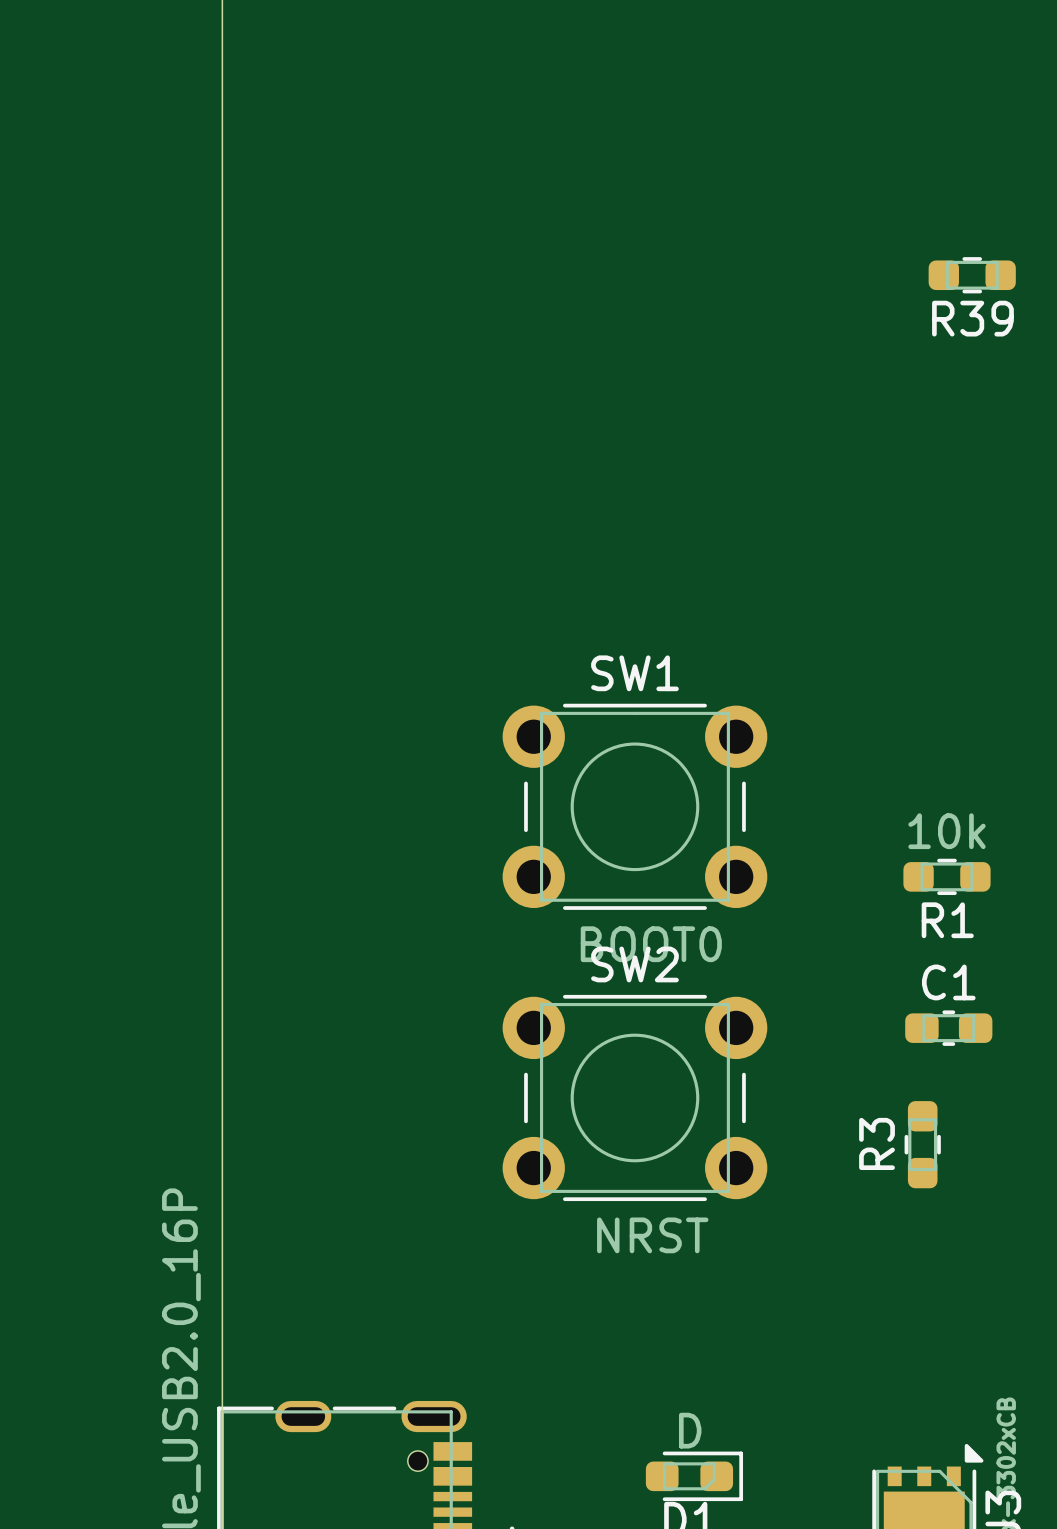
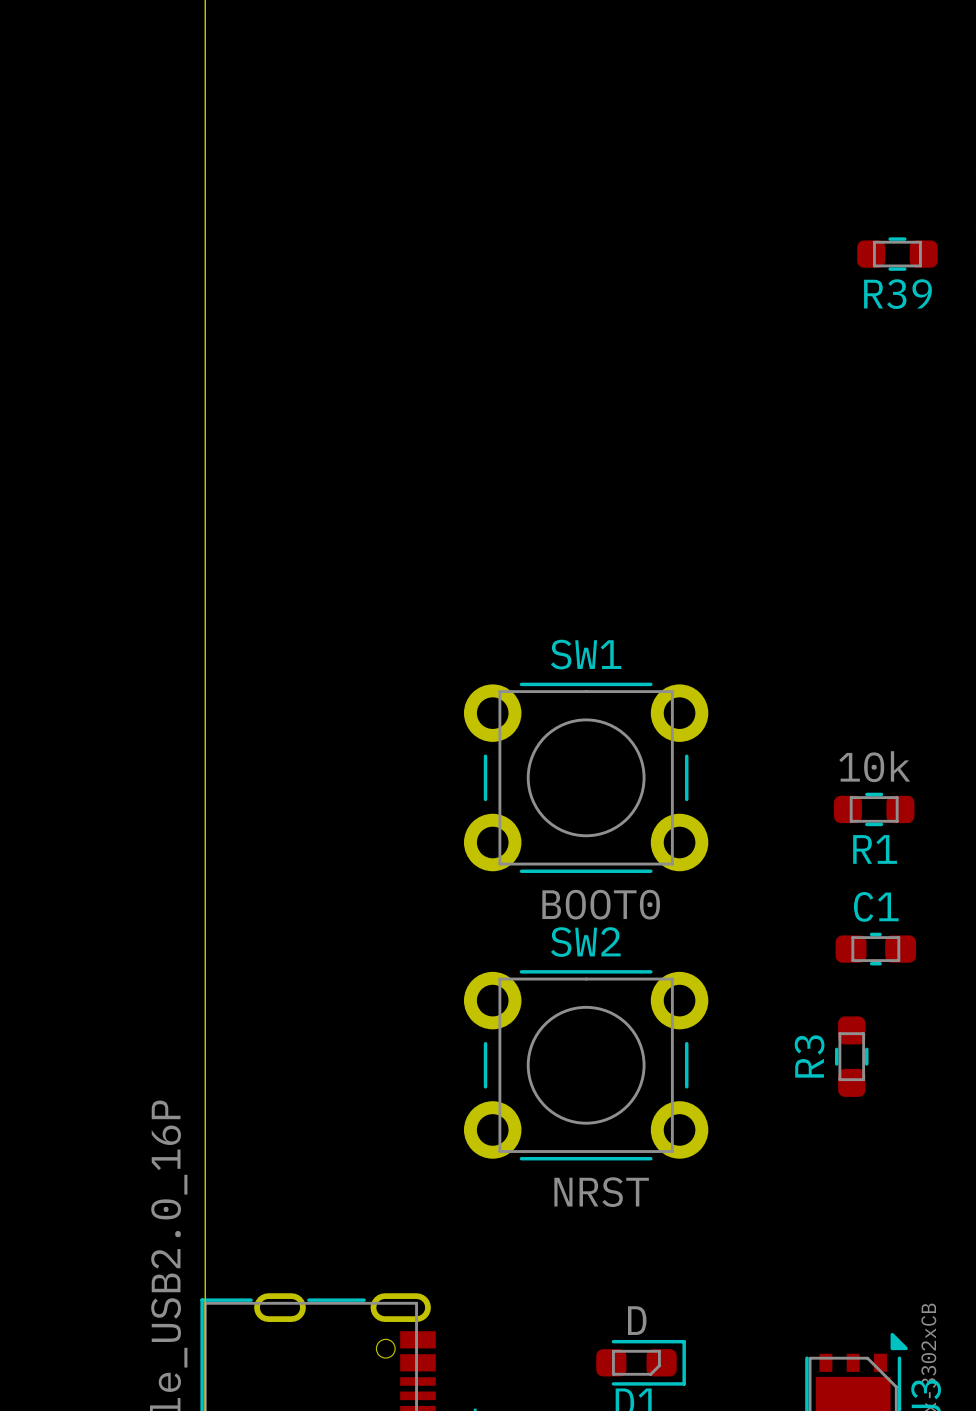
SW1 position: (634, 806) -> (586, 777)
SW2 position: (634, 1097) -> (586, 1065)

